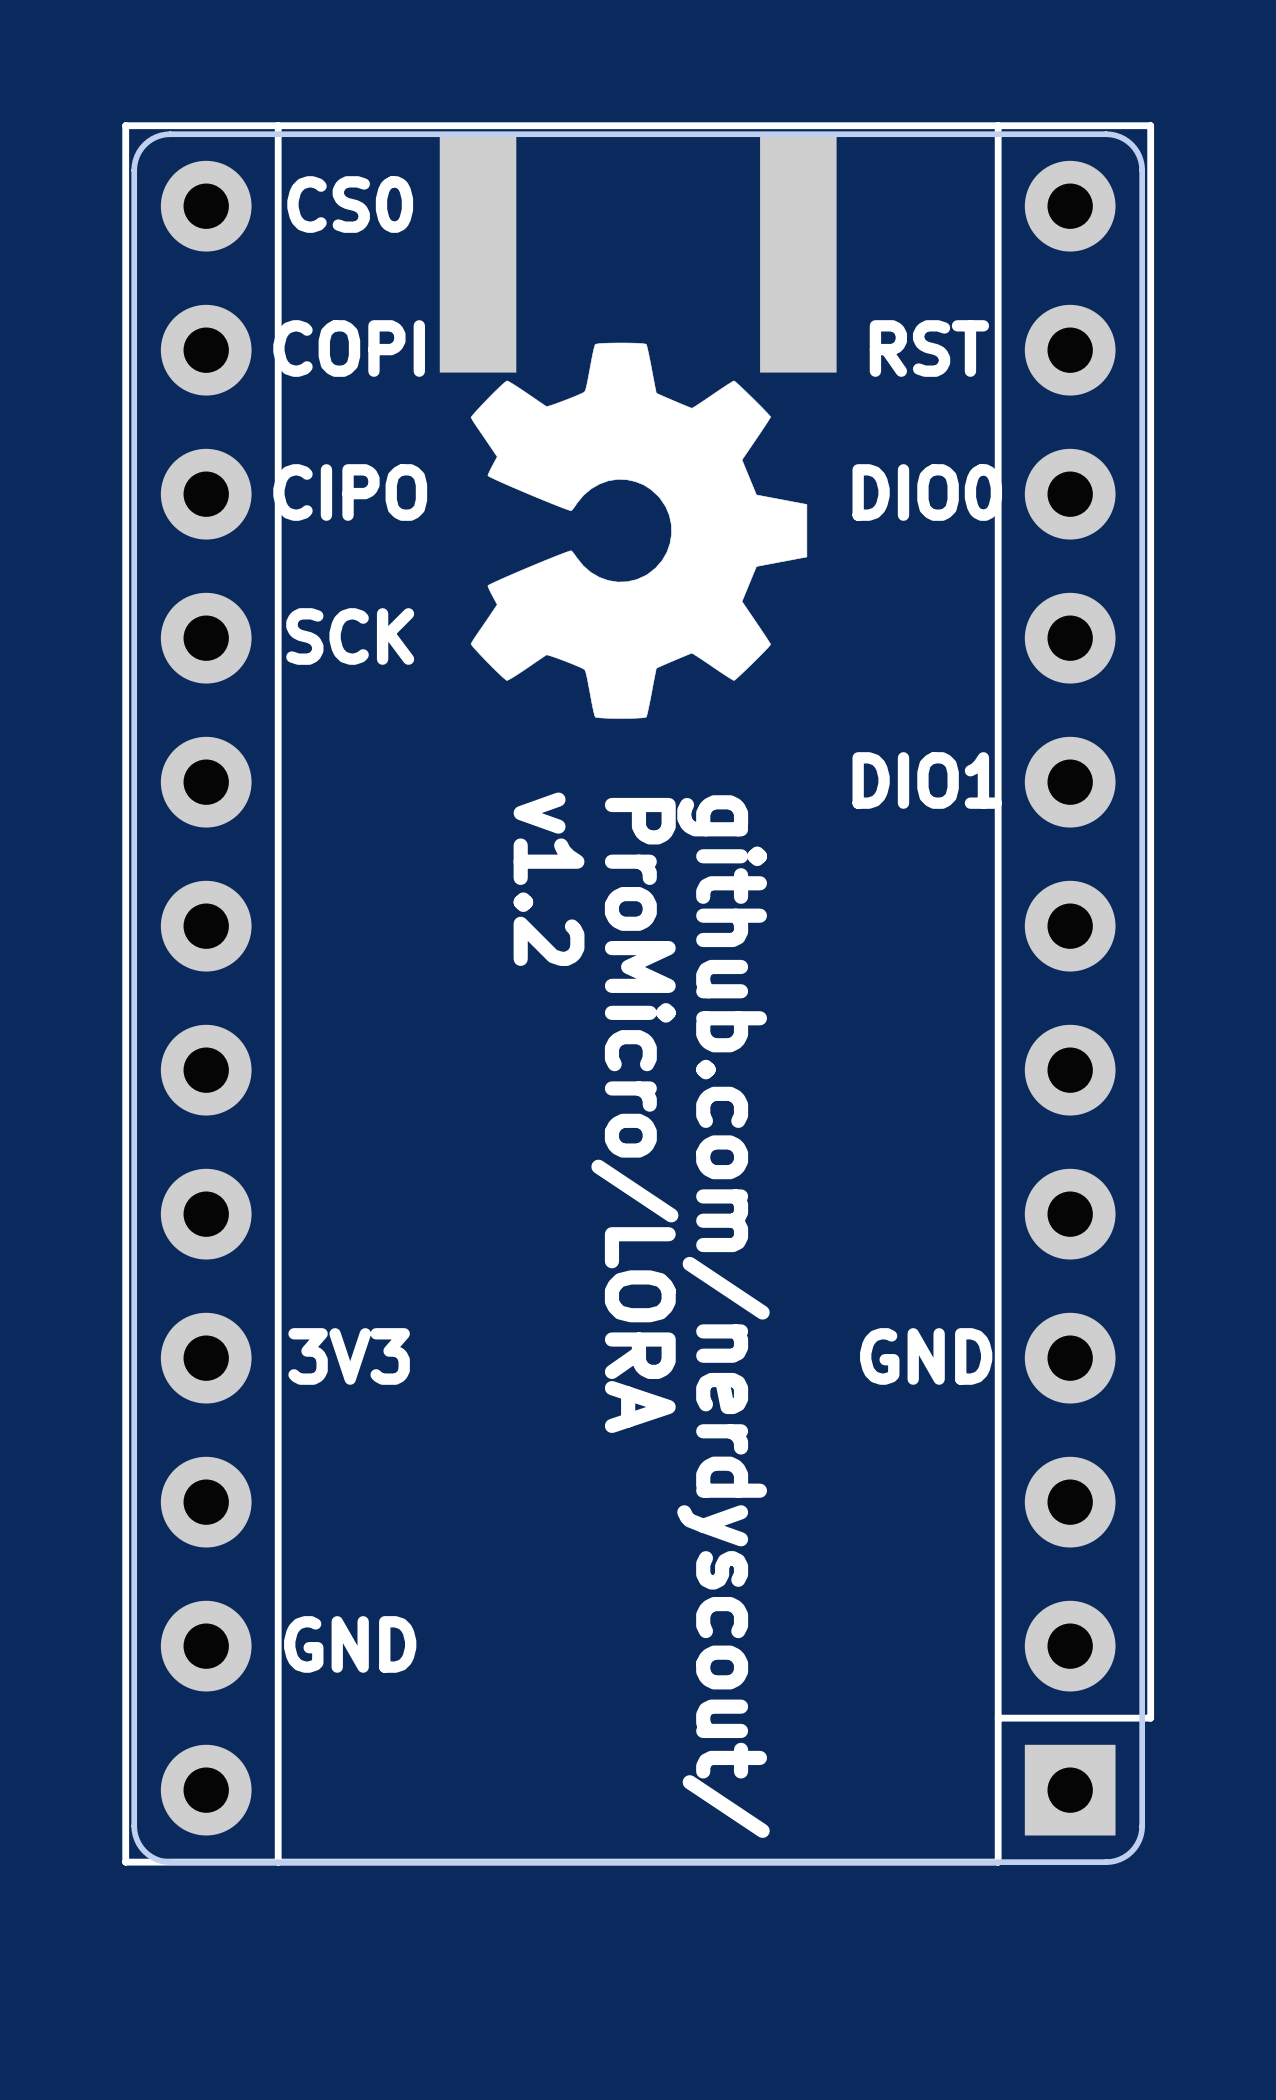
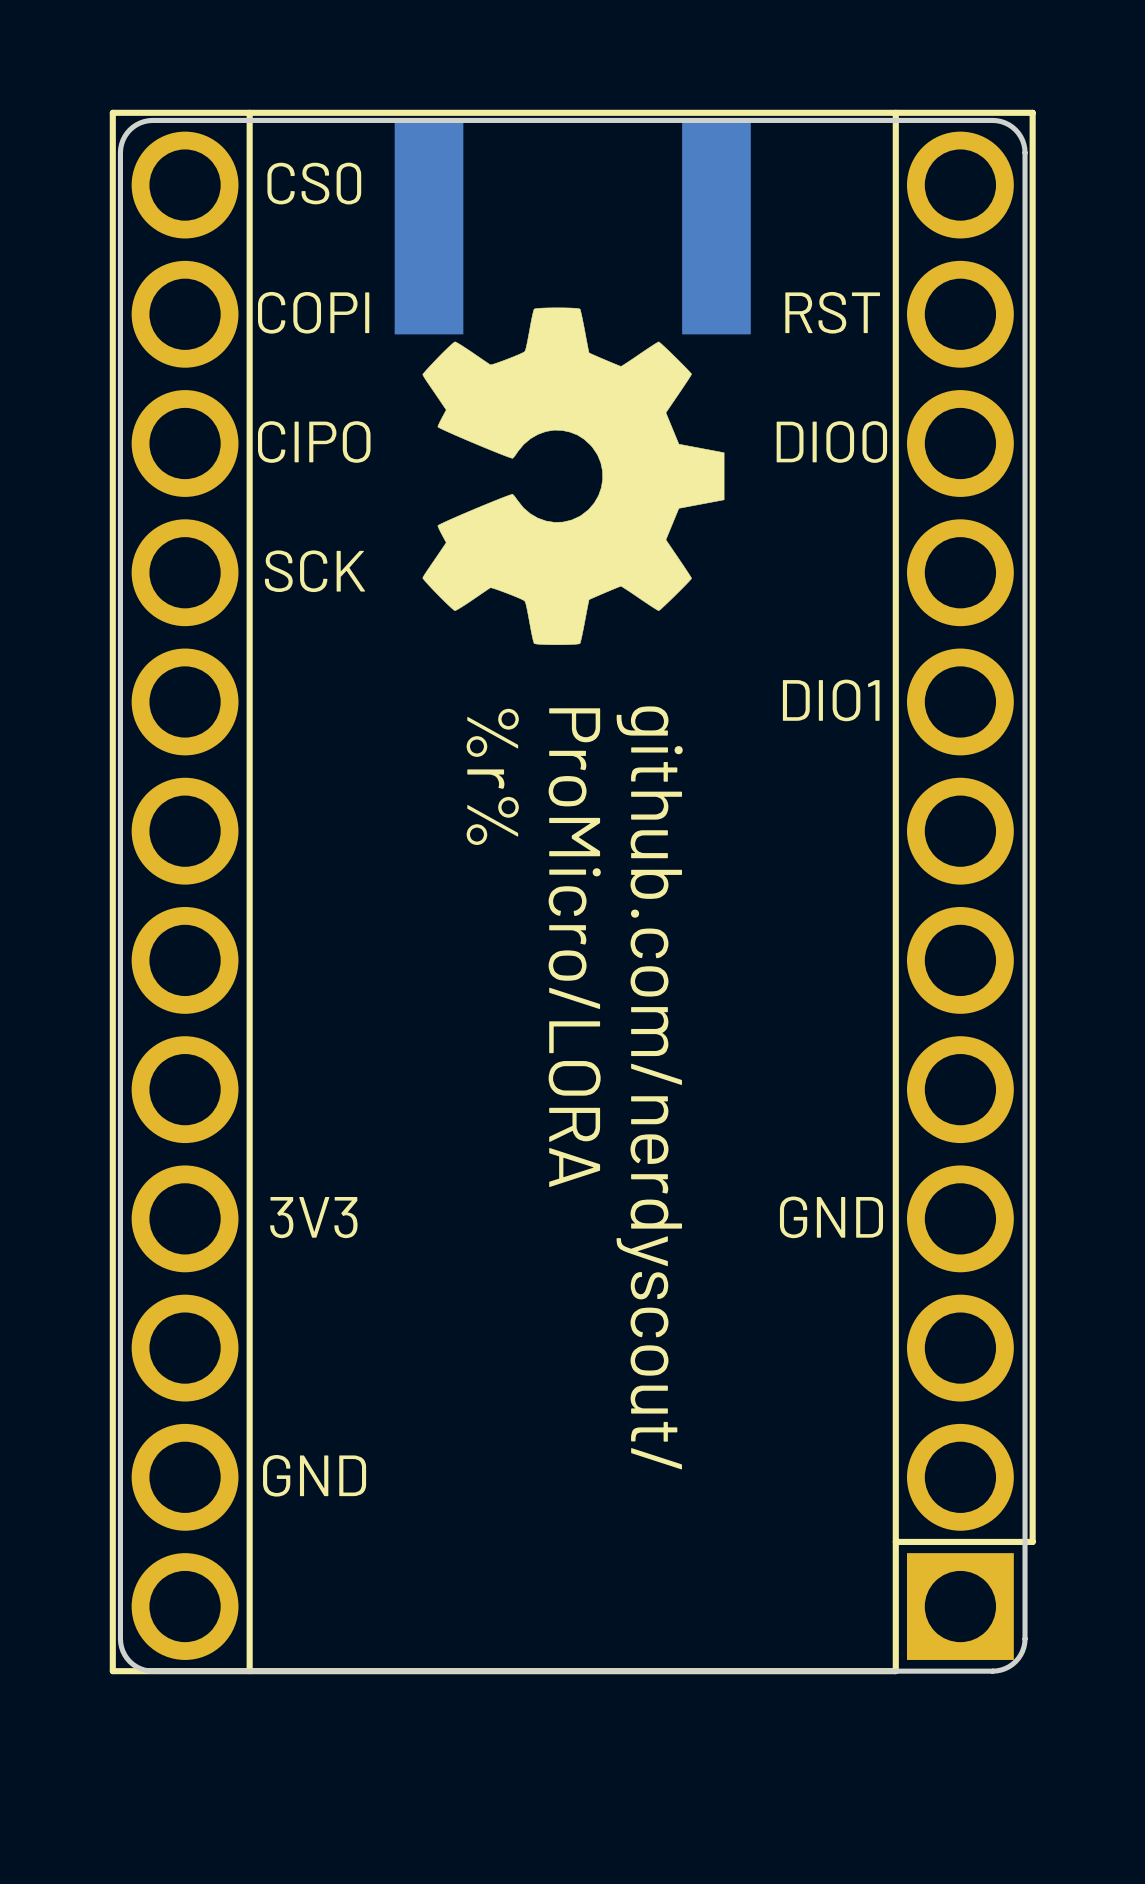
part footprint: [122, 122, 1155, 1866] -> [109, 109, 1036, 1675]
text: v1.2 (549, 879) -> %r% (492, 776)

